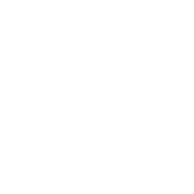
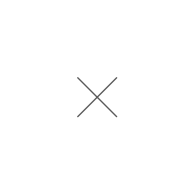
no-connect mark: none -> (97, 97)

